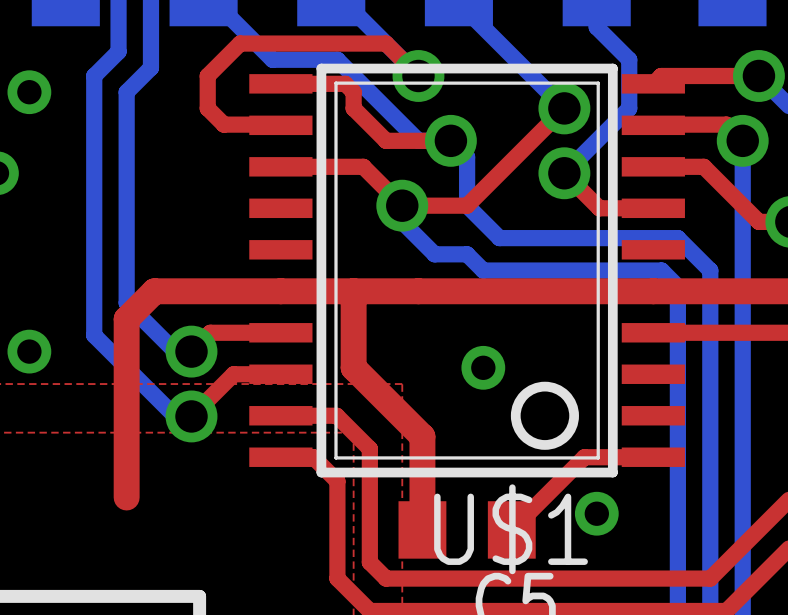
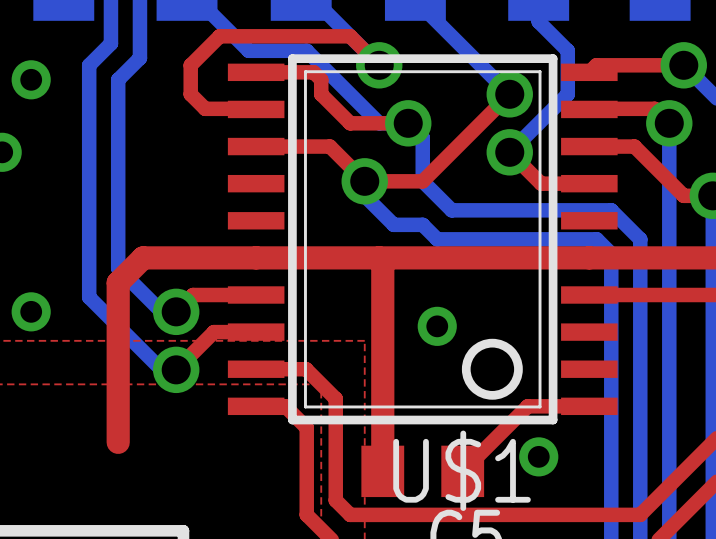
top track: (353, 291) (353, 367) (422, 436) -> (382, 261) (382, 387)

